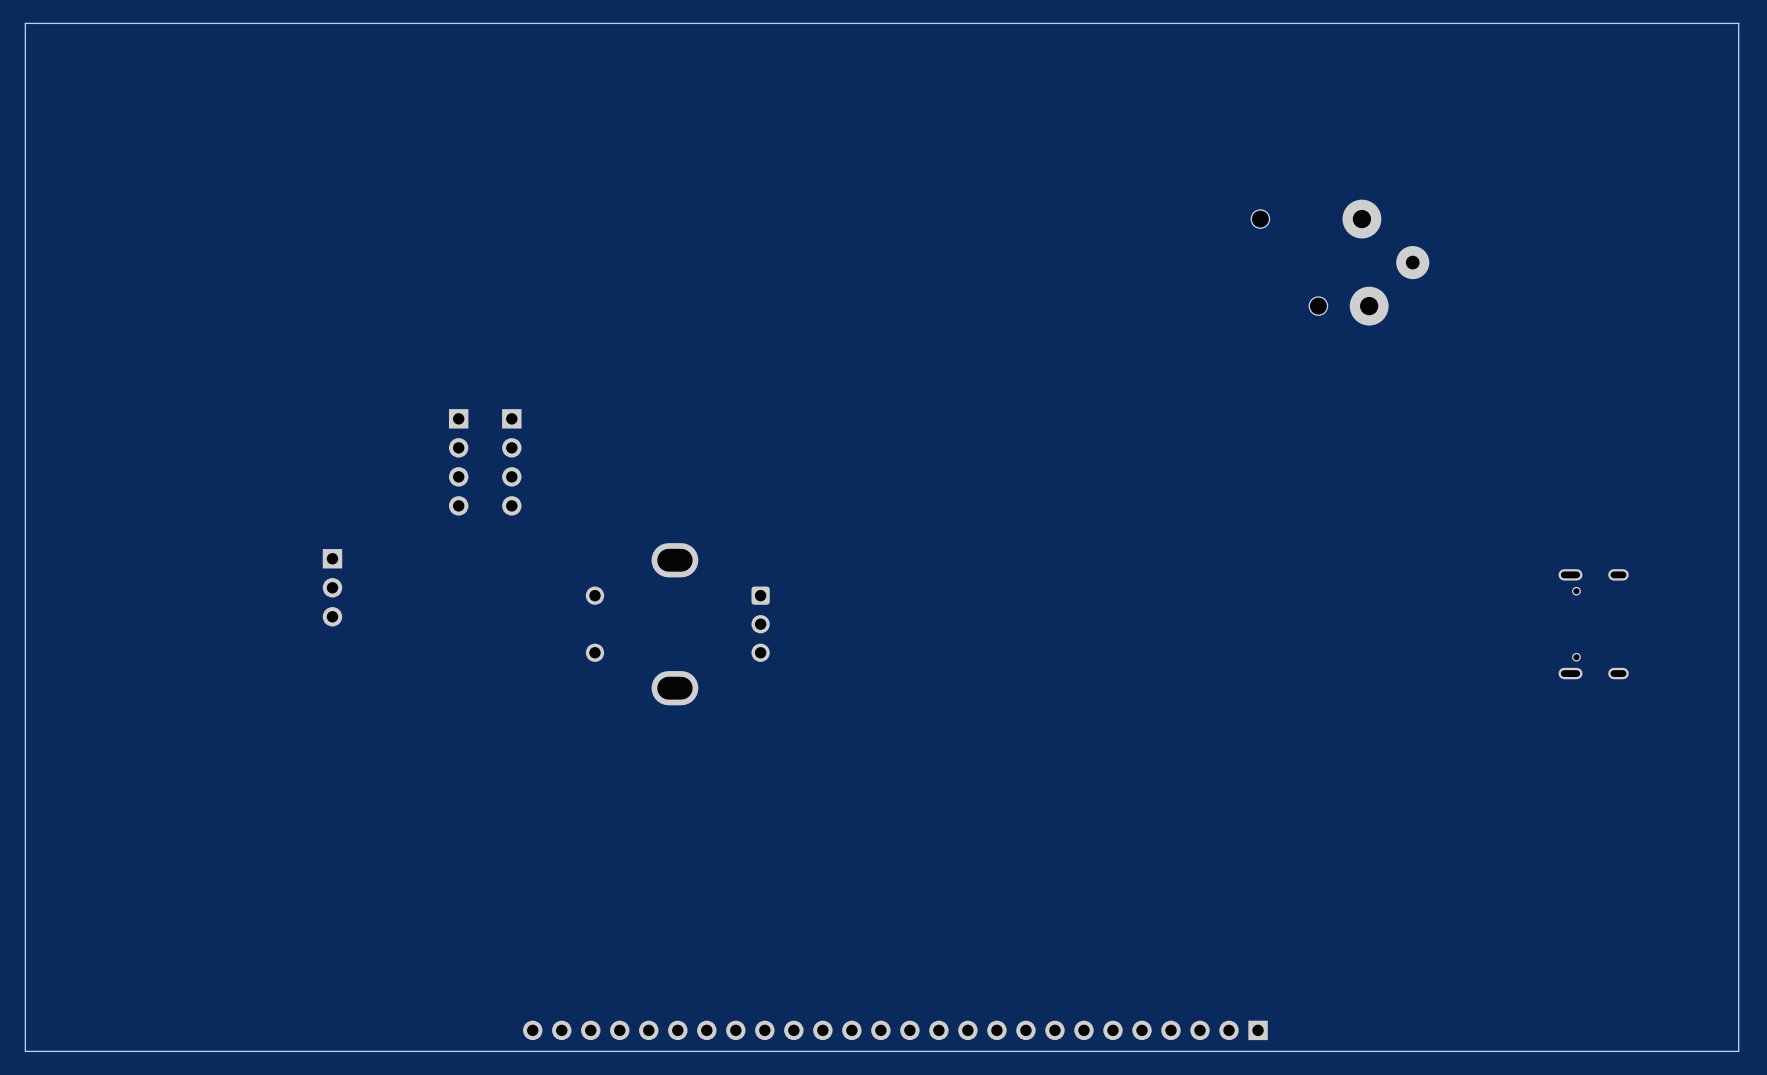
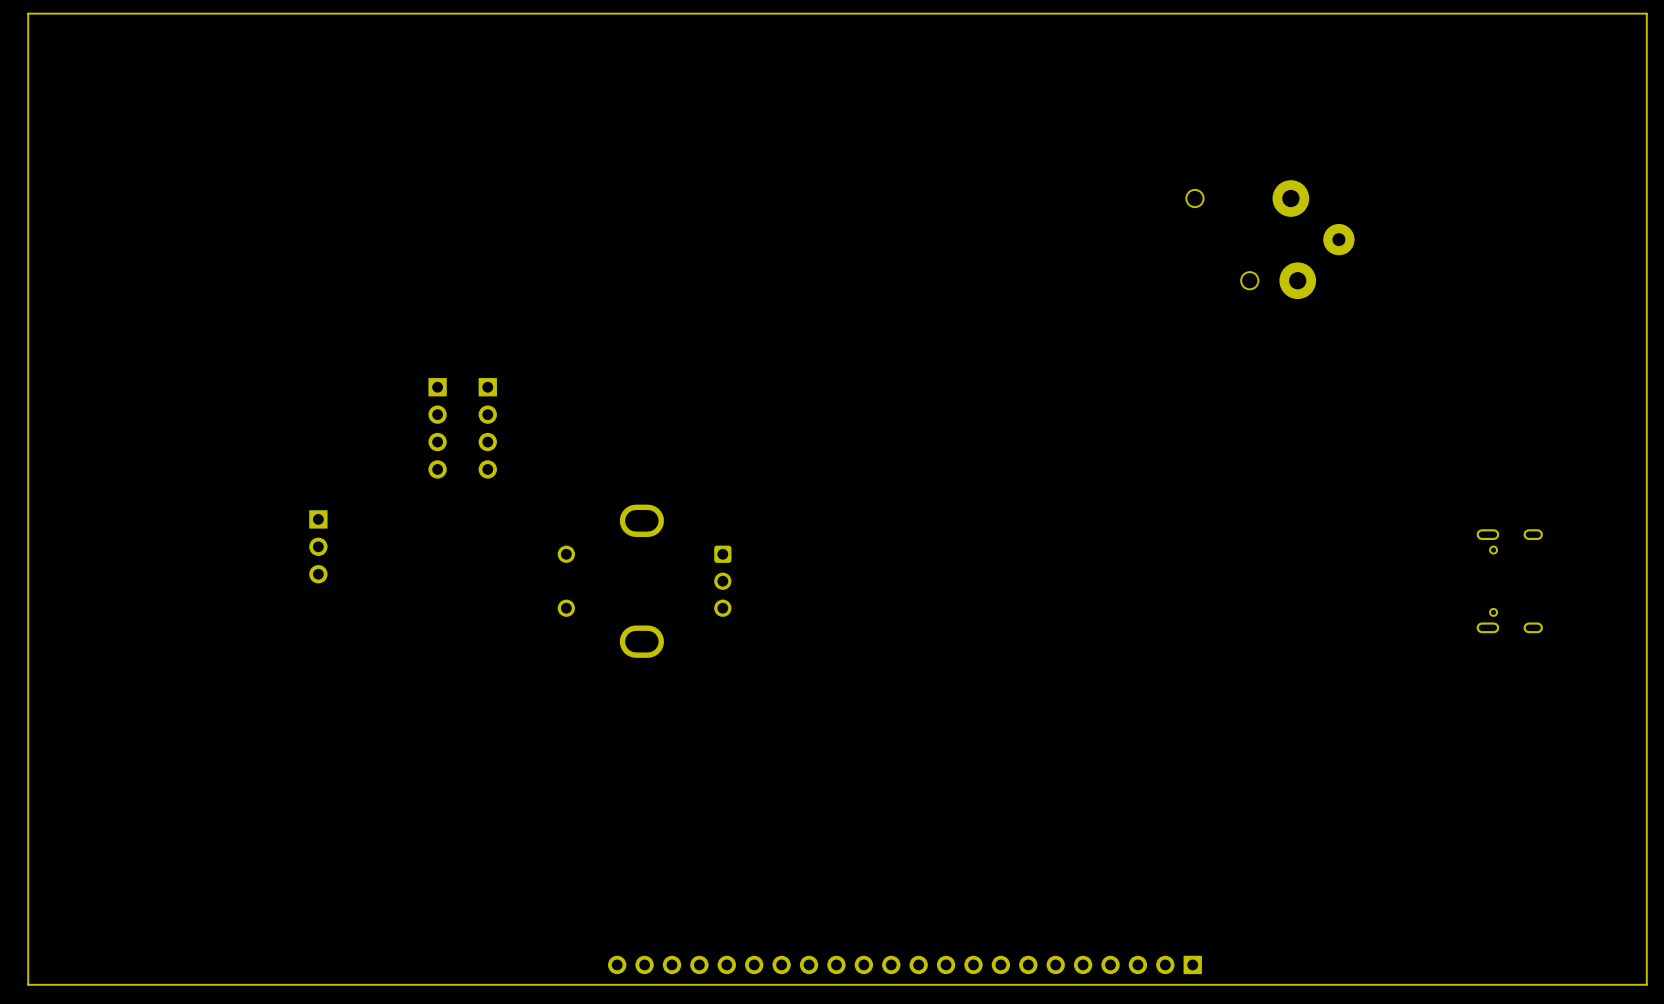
part: (895, 1030) -> none

